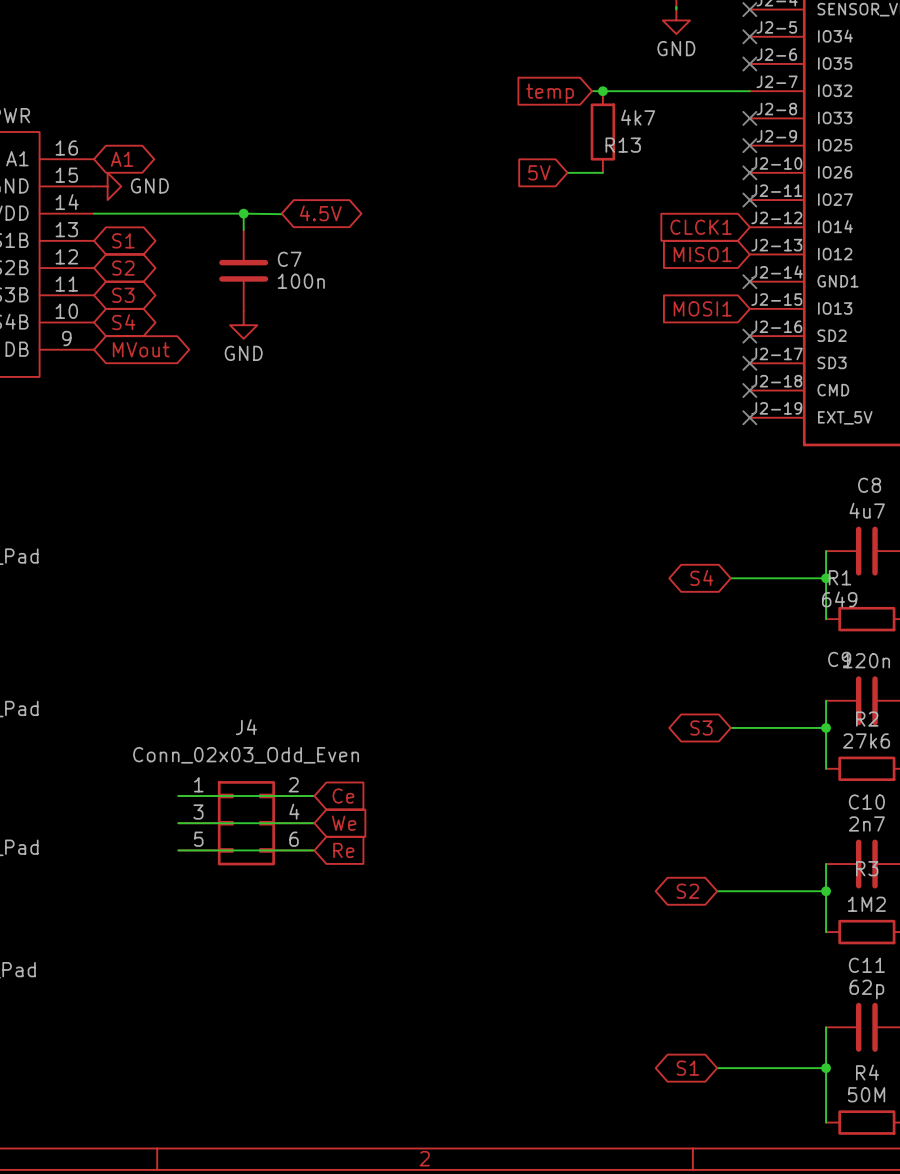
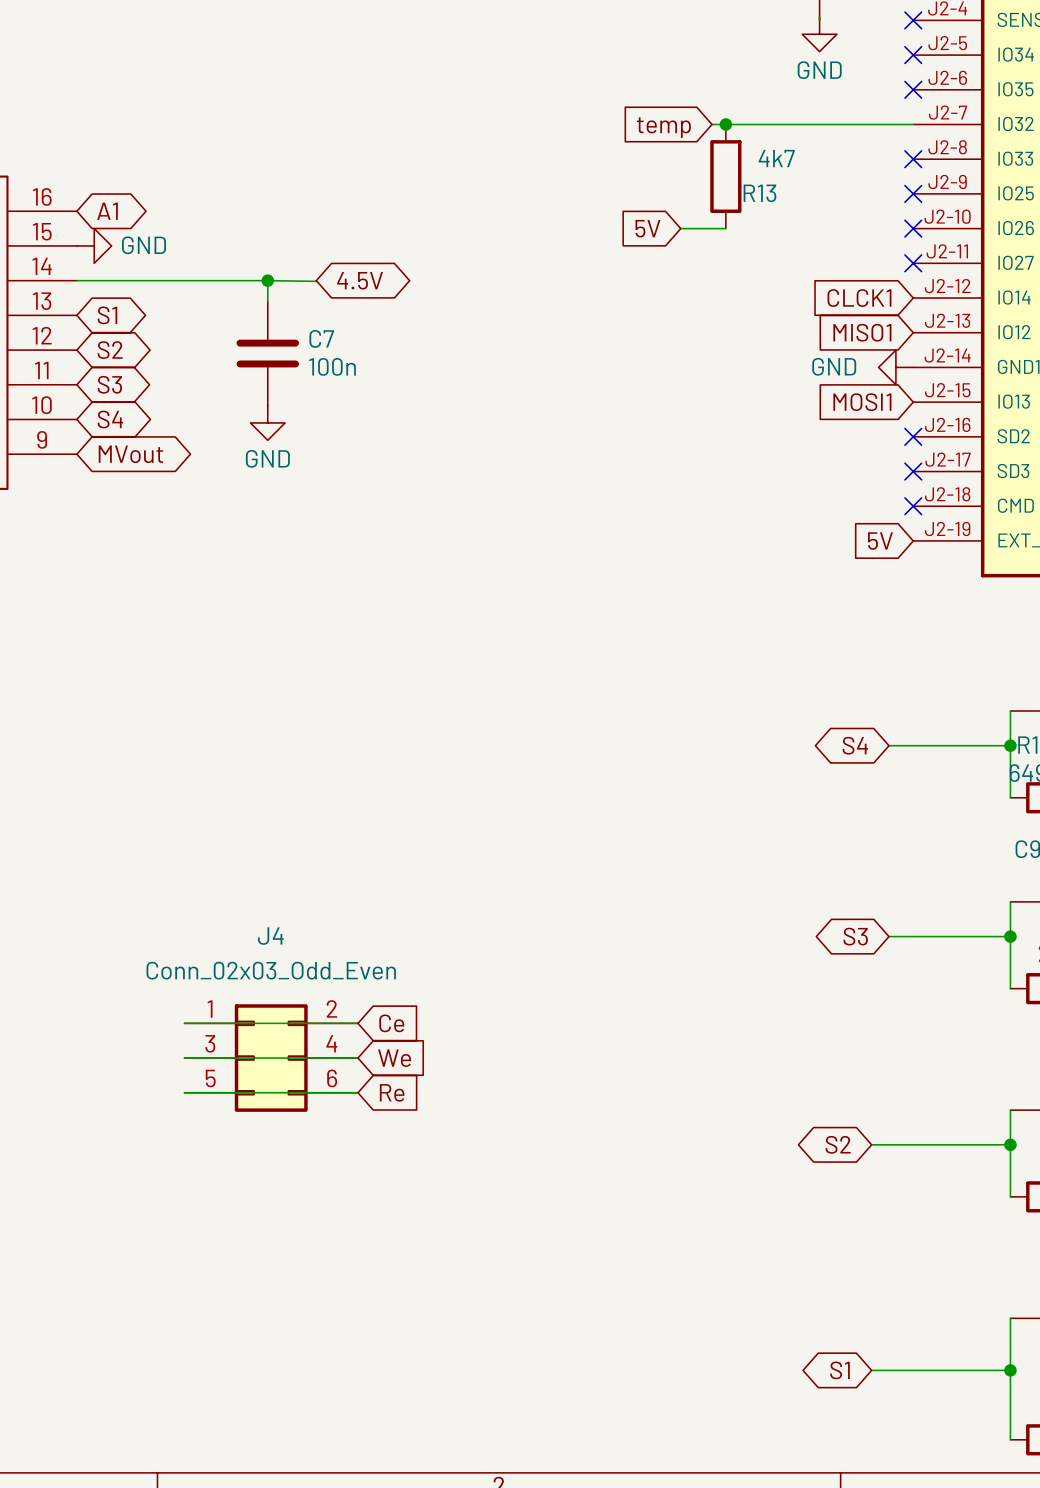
power symbol: none -> GND (895, 367)
no-connect mark: (749, 281) -> none
global label: none -> 5V (880, 541)
no-connect mark: (749, 417) -> none

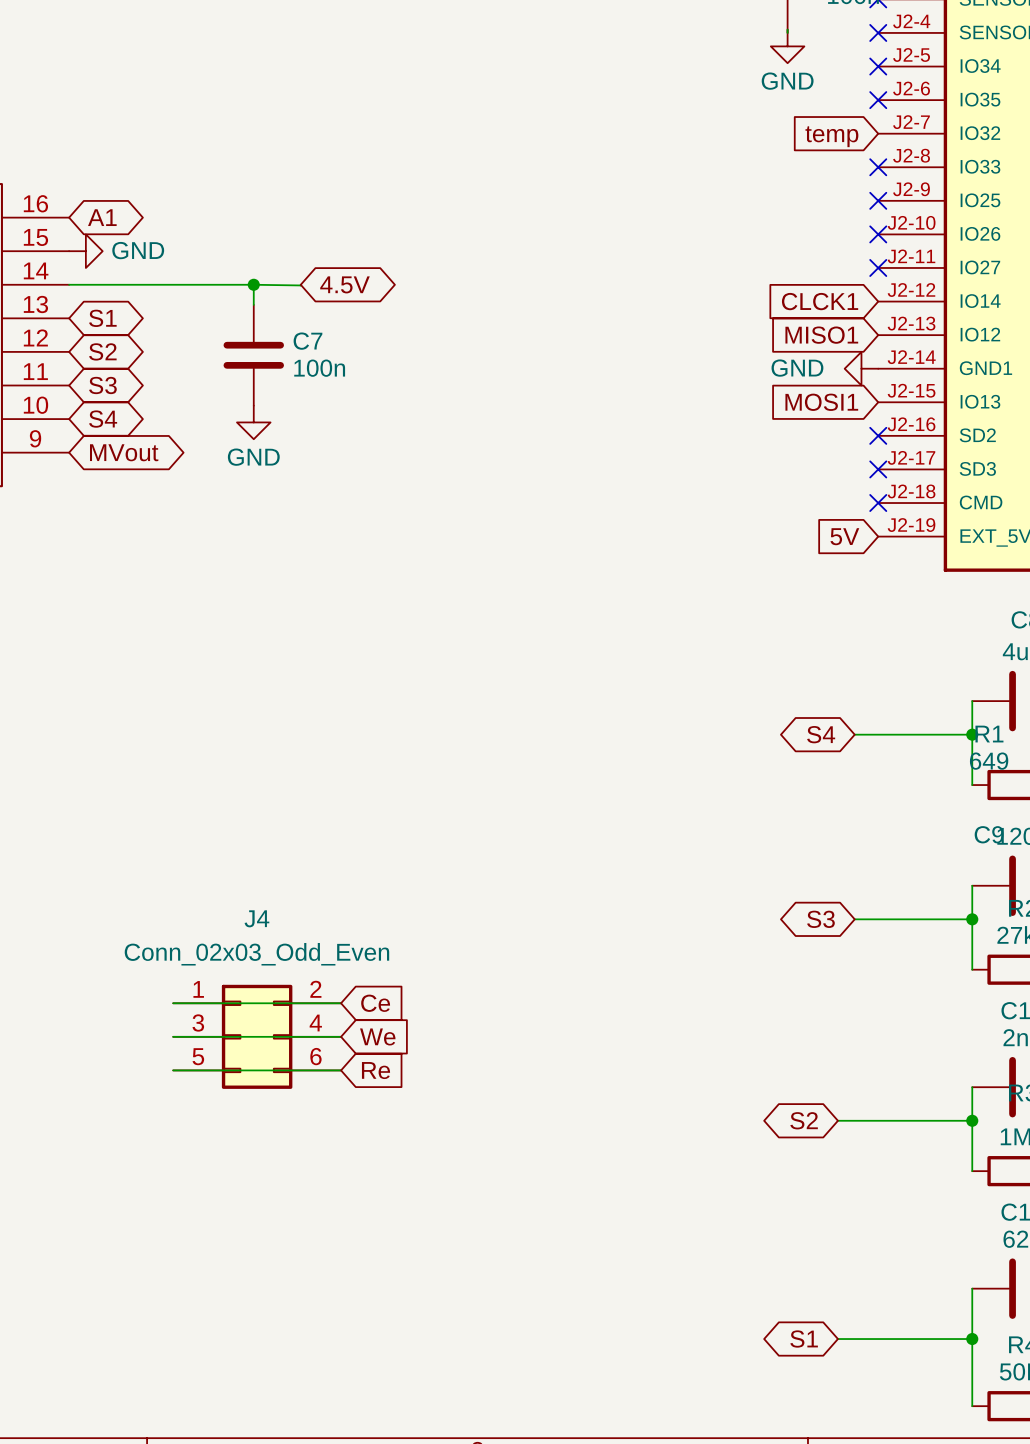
wire: (711, 124) (913, 124) -> none
junction: (725, 124) -> none
global label position: temp (663, 127) -> temp (831, 136)
R13: 4k7 (725, 176) -> none
global label: 5V (647, 228) -> none
wire: (680, 228) (725, 228) -> none

